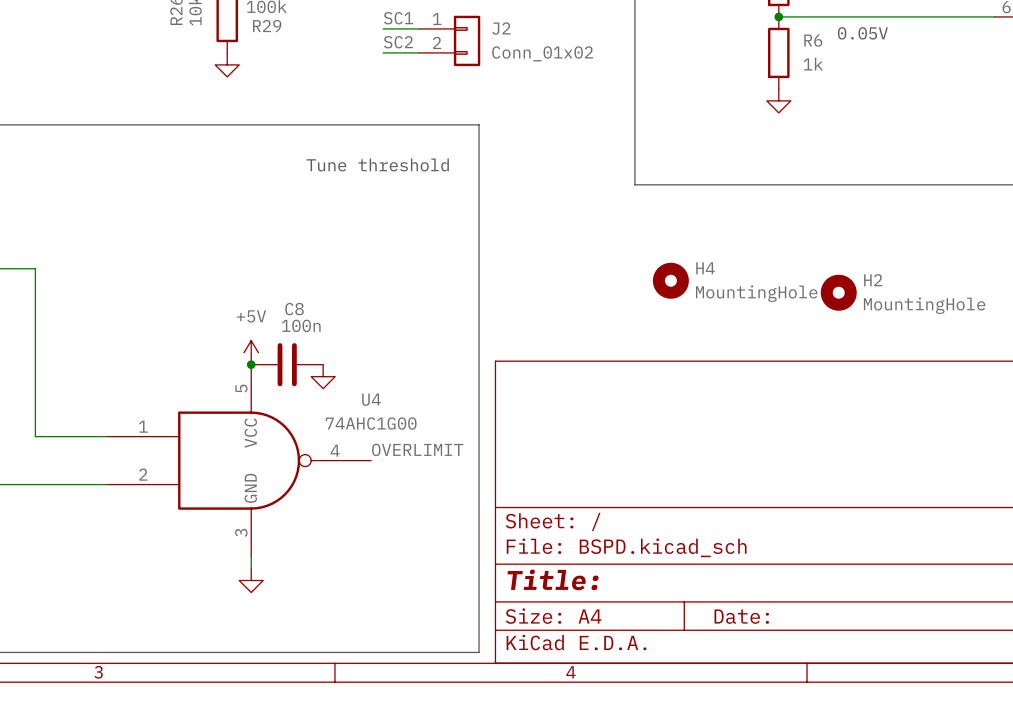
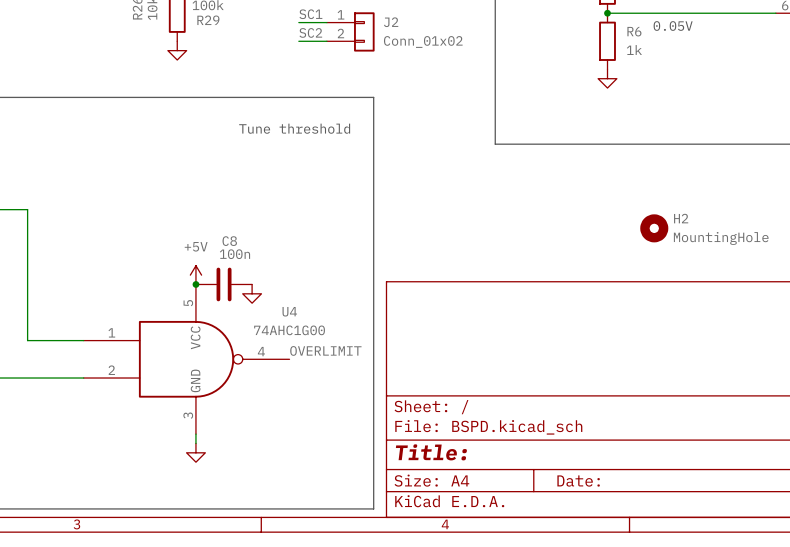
H4: MountingHole (670, 280) -> none

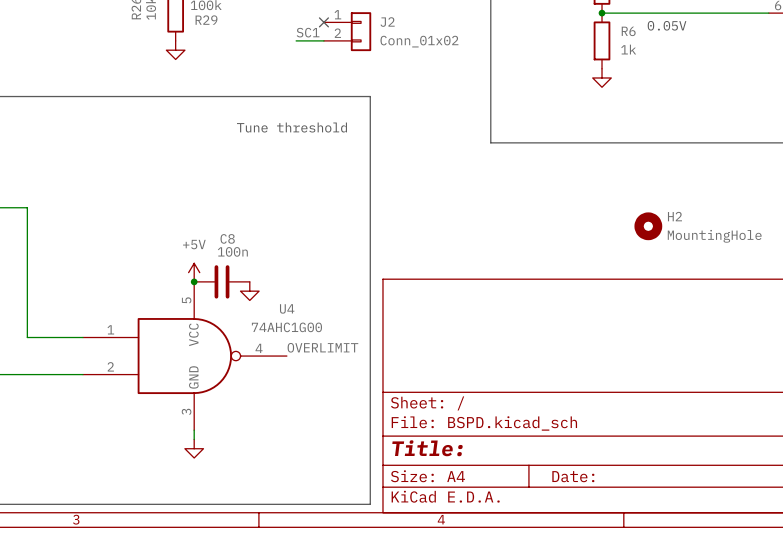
label: SC1 (310, 14) -> none
wire: (298, 22) (326, 22) -> none
no-connect mark: none -> (323, 22)
label: SC2 (310, 32) -> SC1 (308, 32)

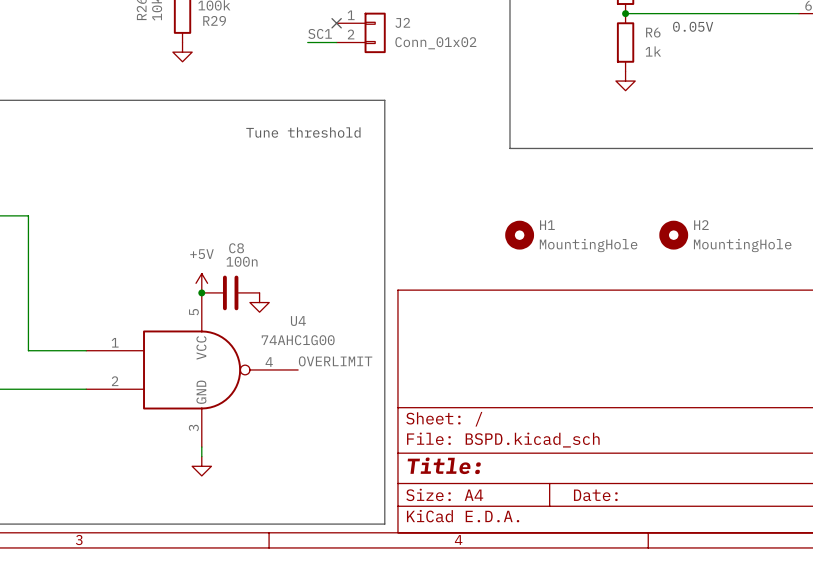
H1: none -> MountingHole (519, 235)

